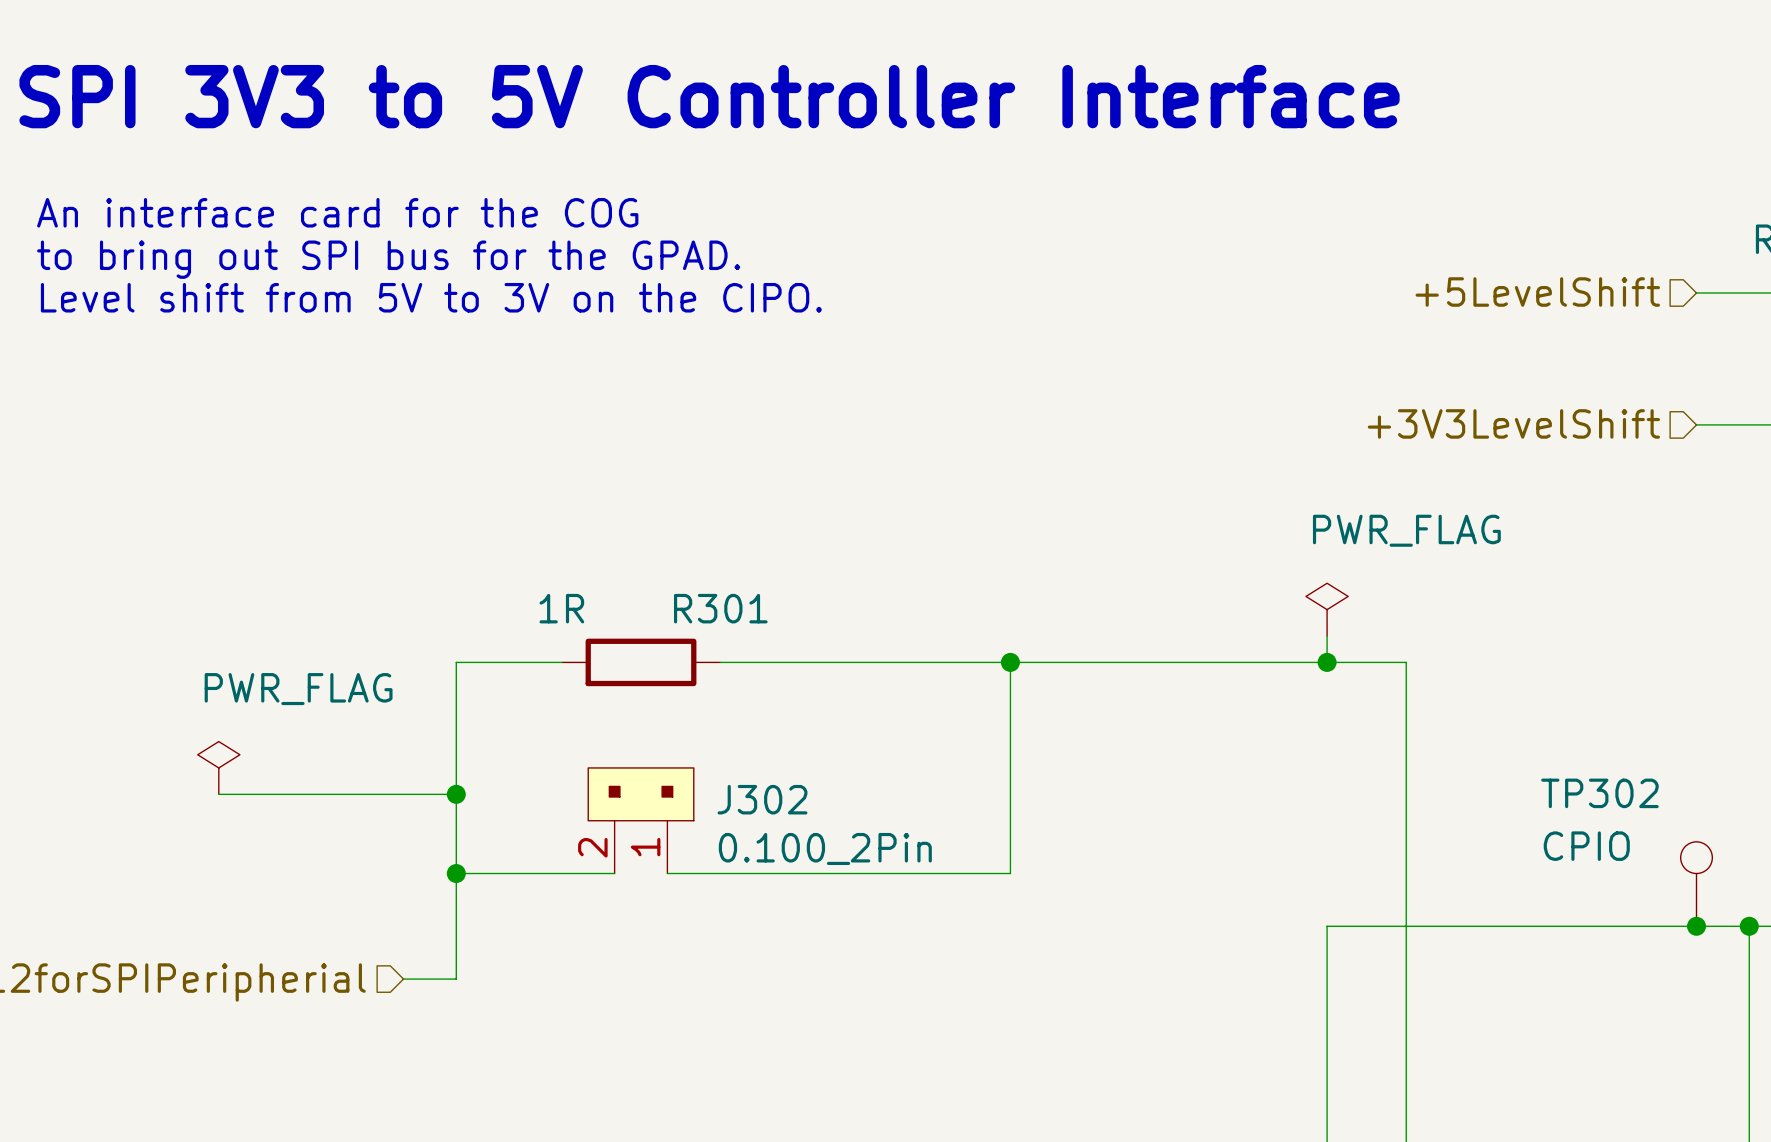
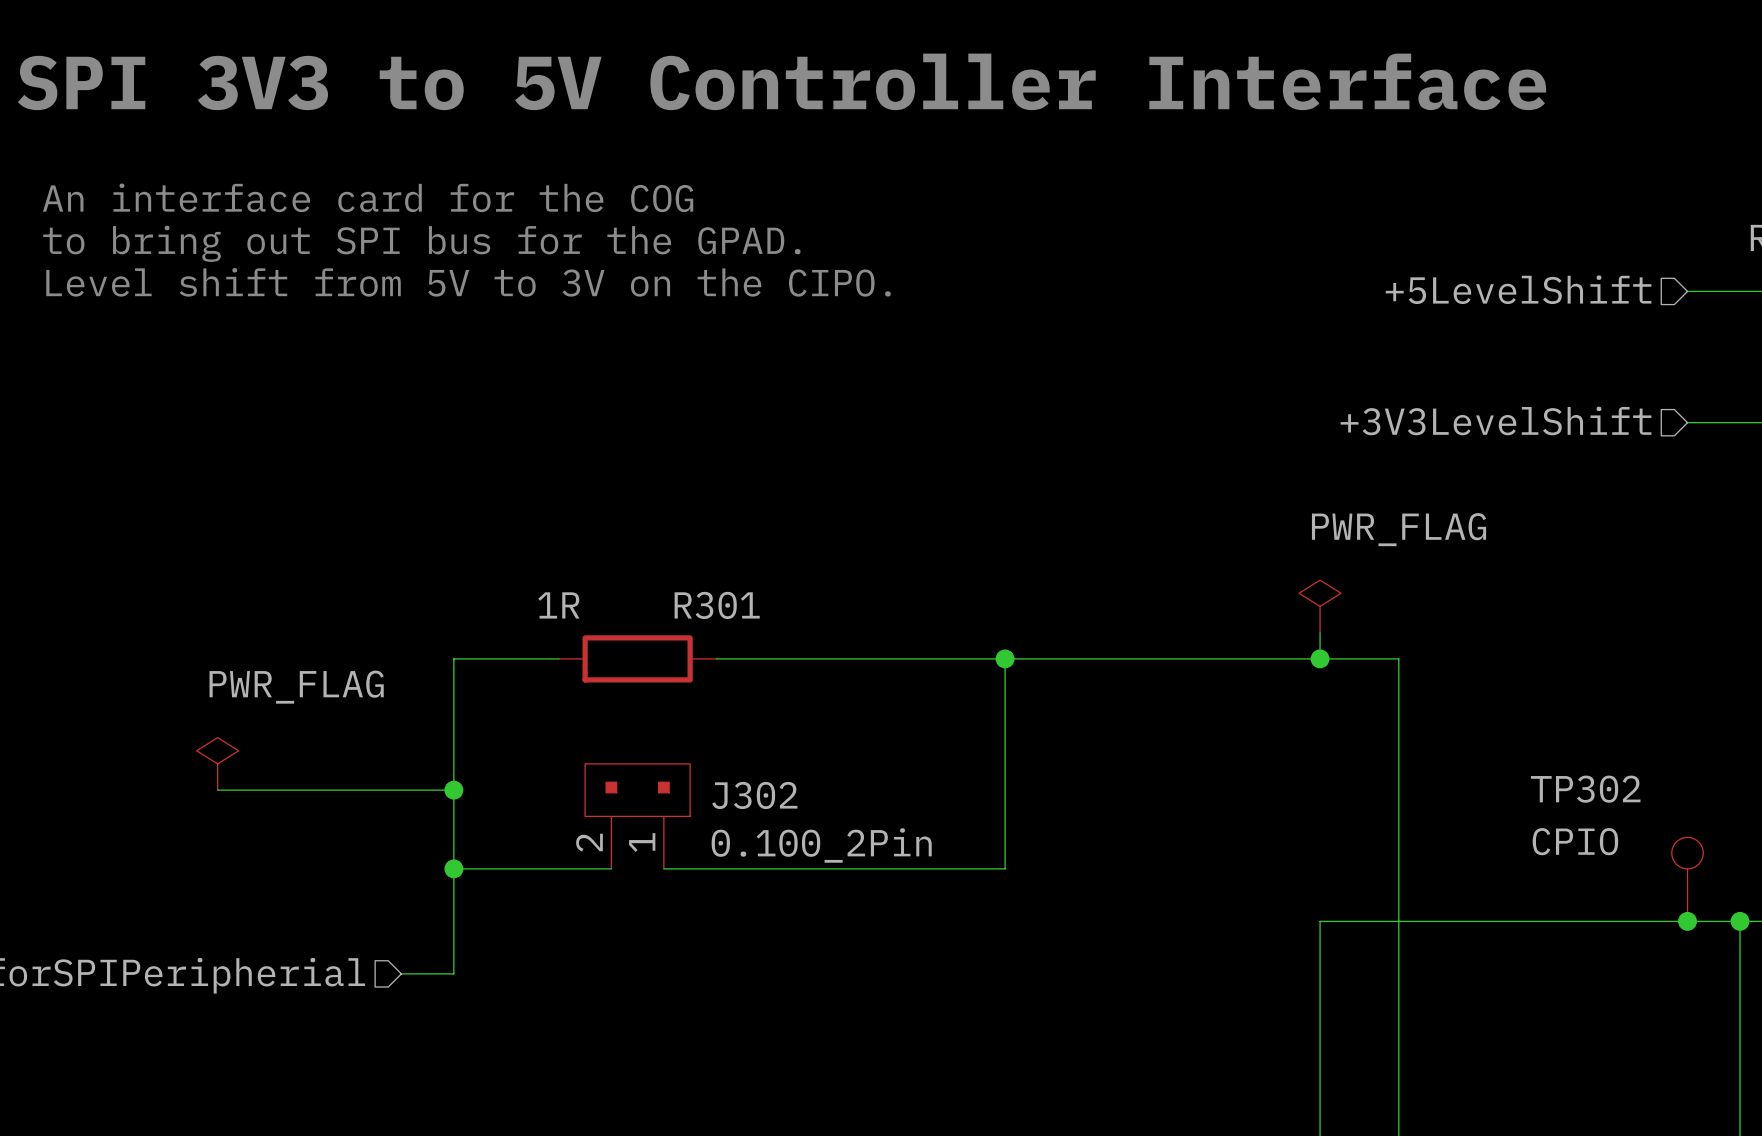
text position: SPI 3V3 to 5V Controller Interface (709, 96) -> SPI 3V3 to 5V Controller Interface (781, 81)
text position: An interface card for the COG (337, 212) -> An interface card for the COG (368, 197)
text position: to bring out SPI bus for the GPAD. (388, 259) -> to bring out SPI bus for the GPAD. (421, 243)
text position: Level shift from 5V to 3V on the CIPO. (431, 297) -> Level shift from 5V to 3V on the CIPO. (468, 282)

